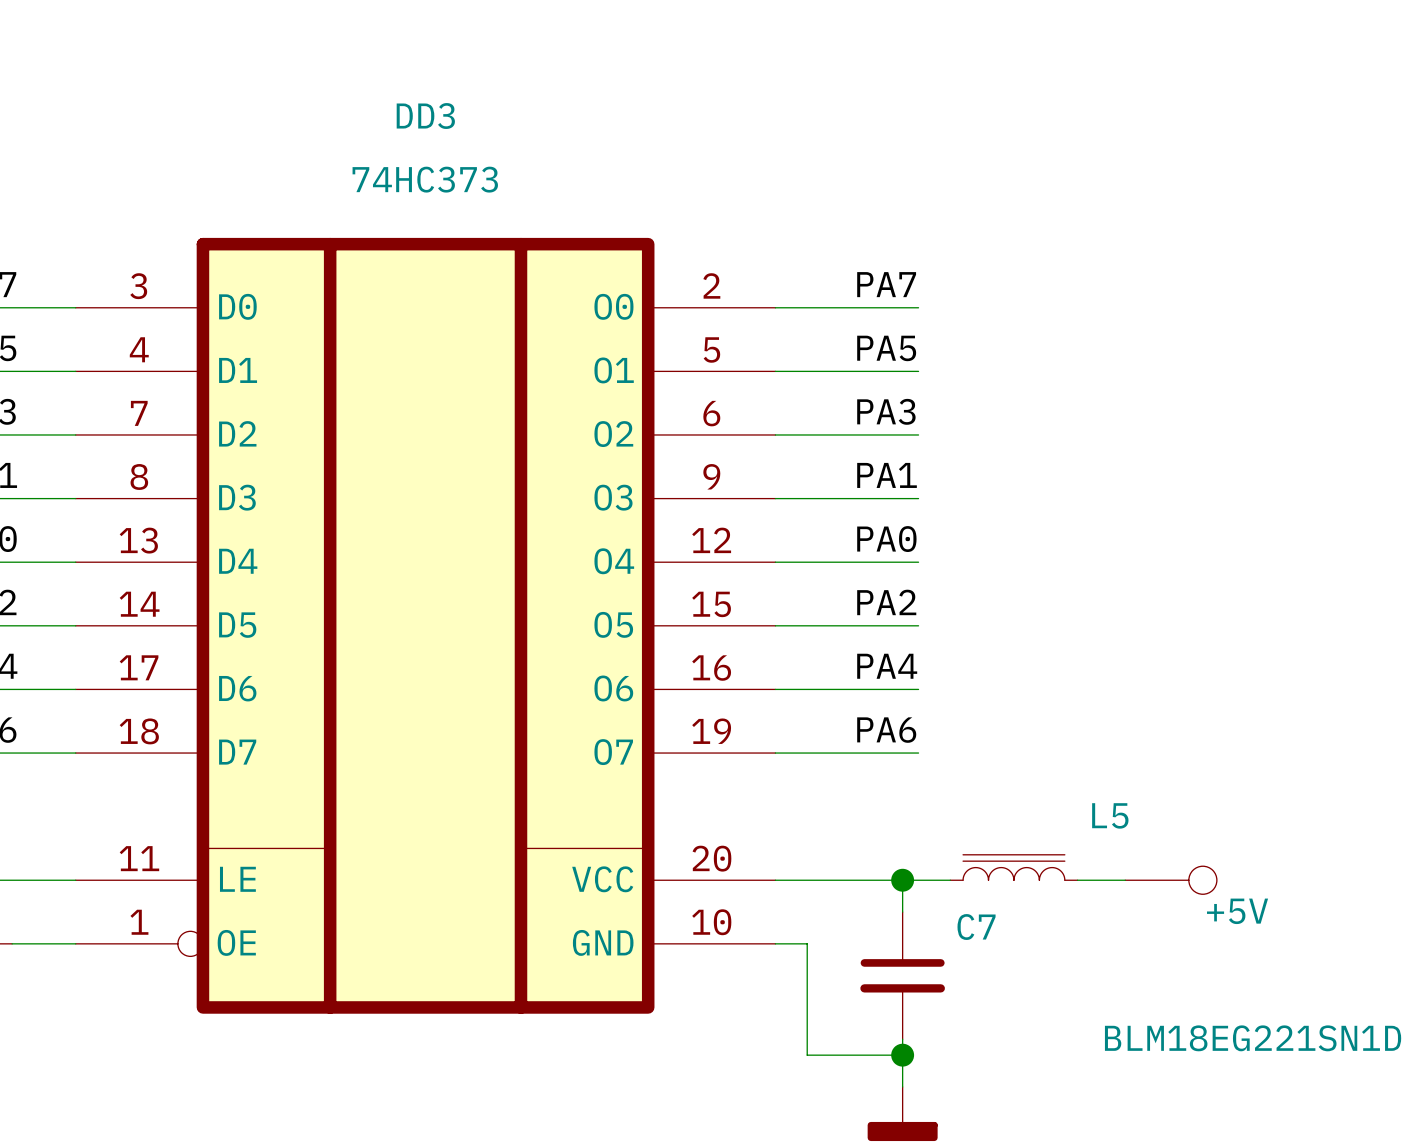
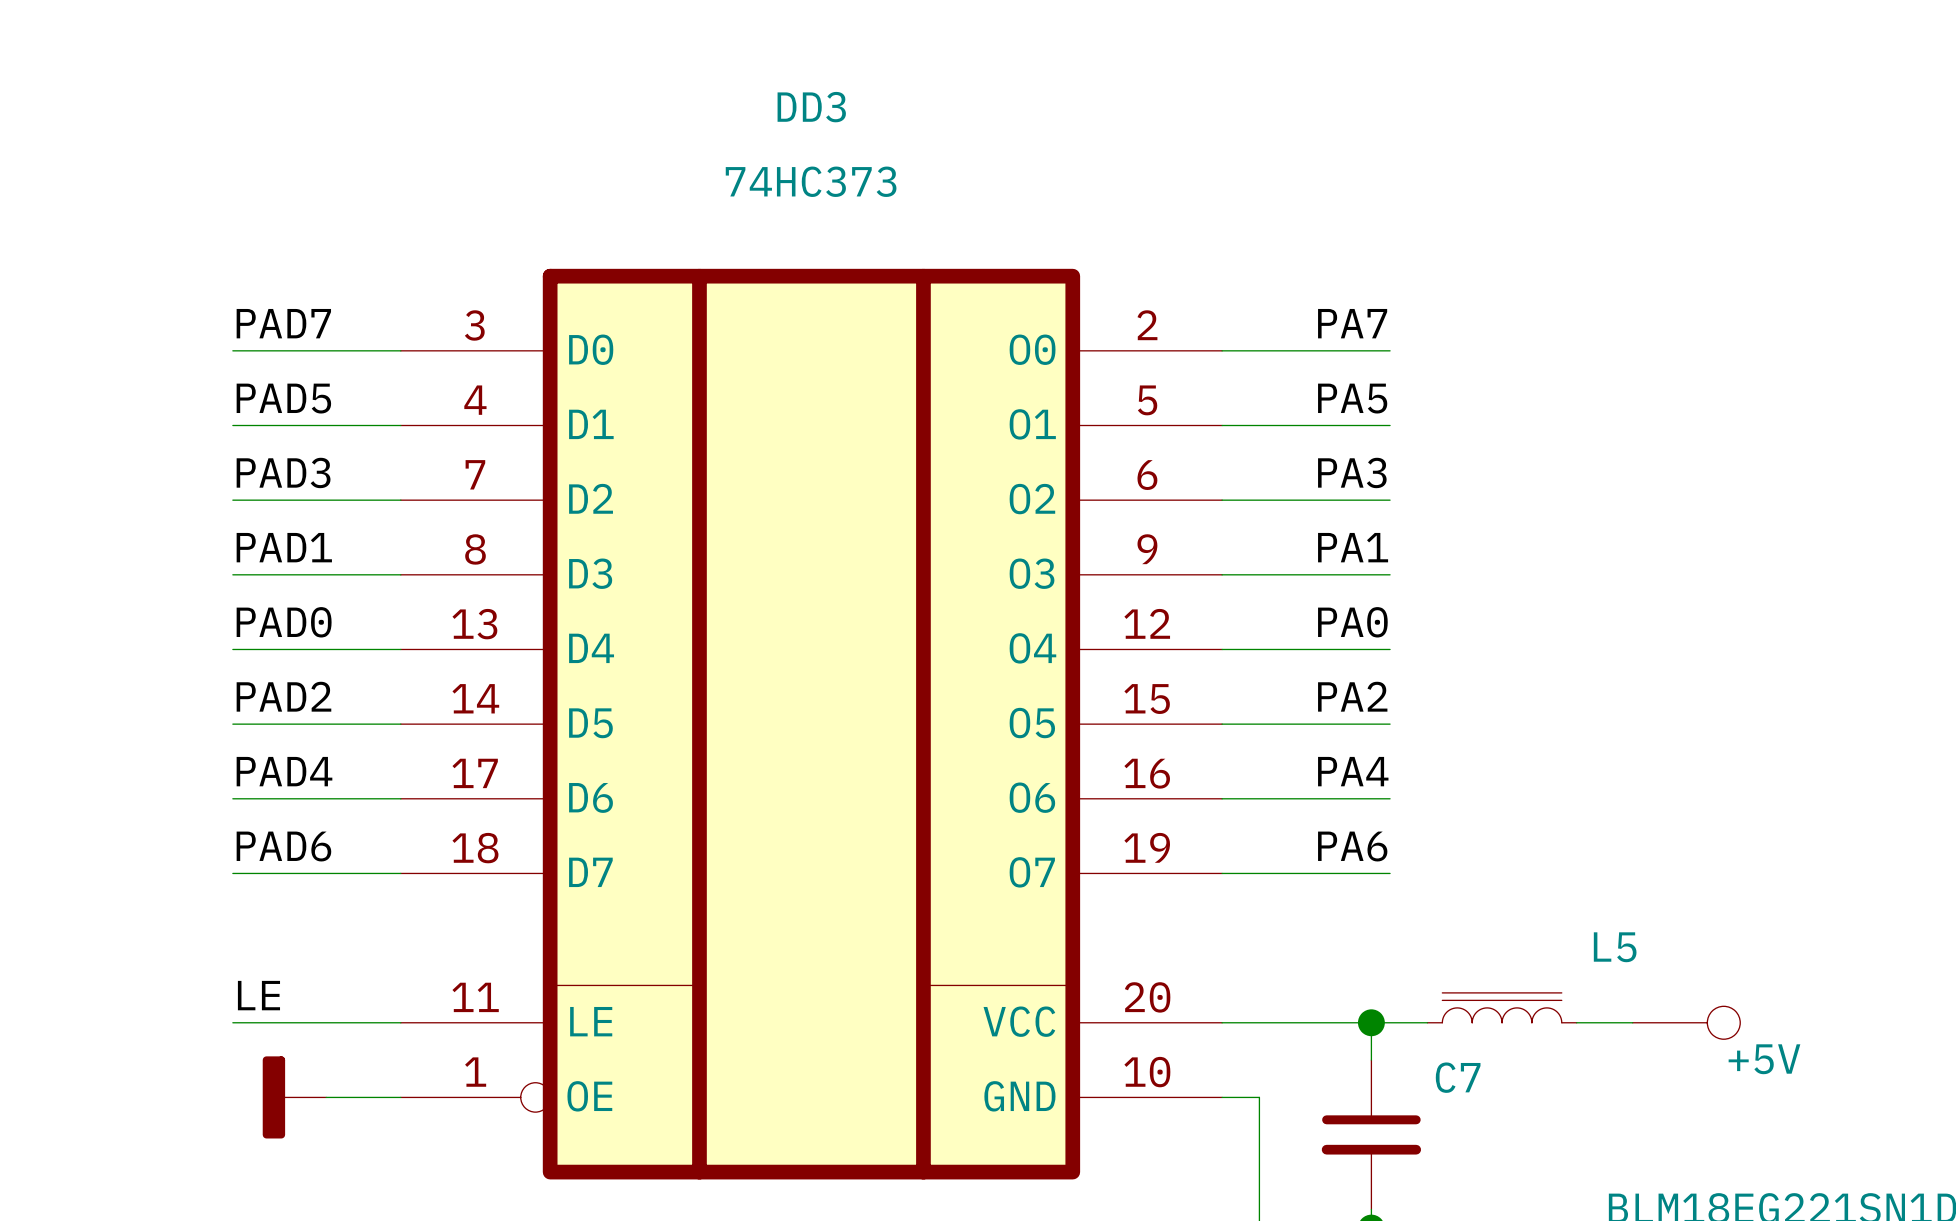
DD3 name position: DD3 (425, 116) -> DD3 (811, 107)
DD3 value position: 74HC373 (425, 179) -> 74HC373 (811, 181)

